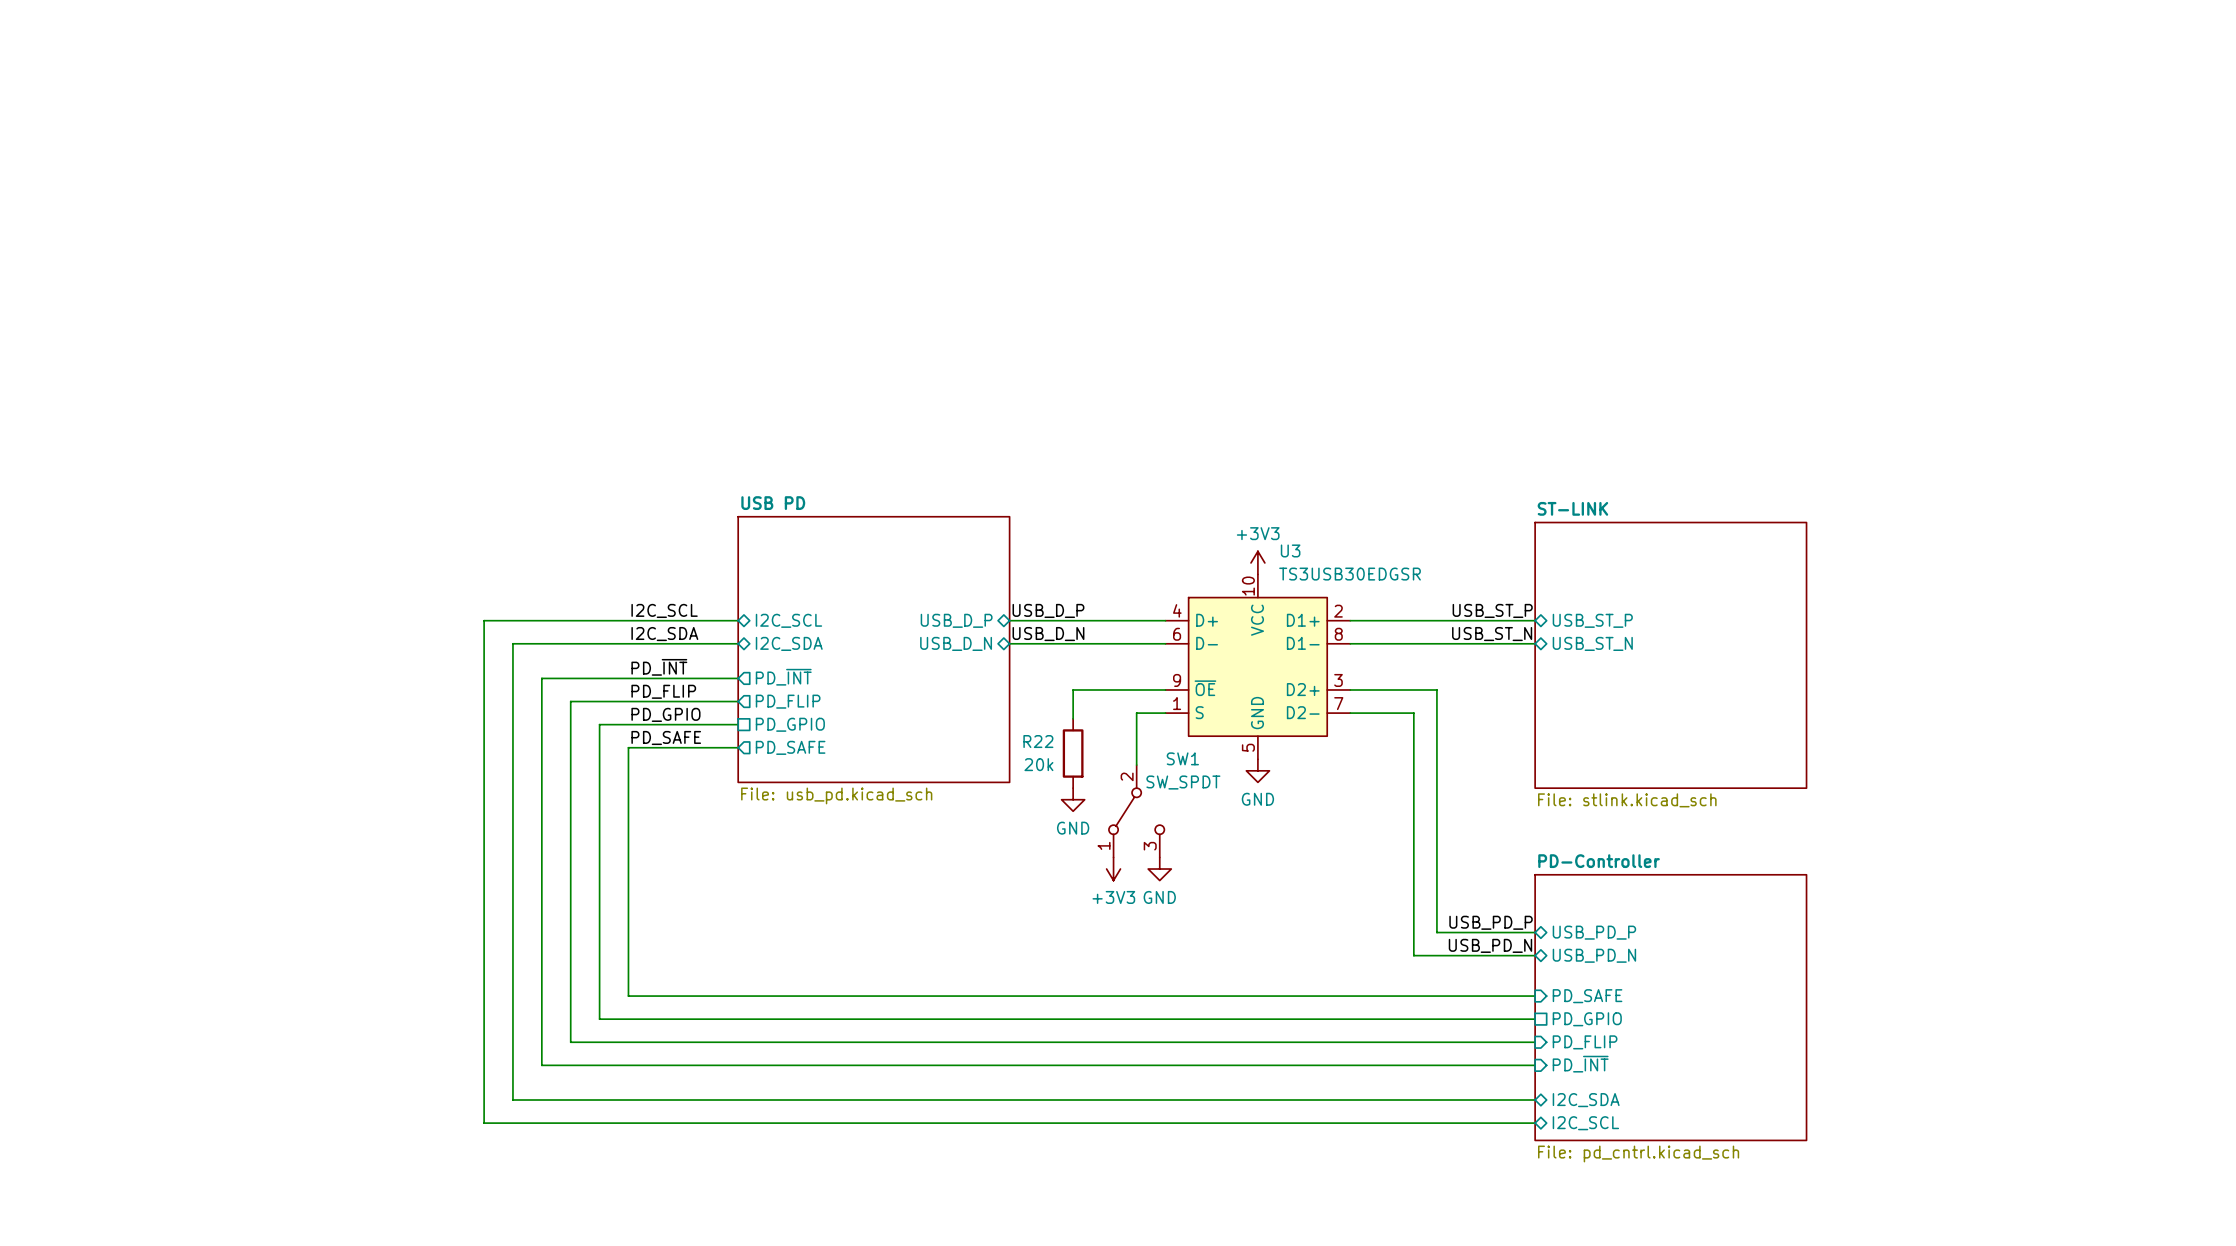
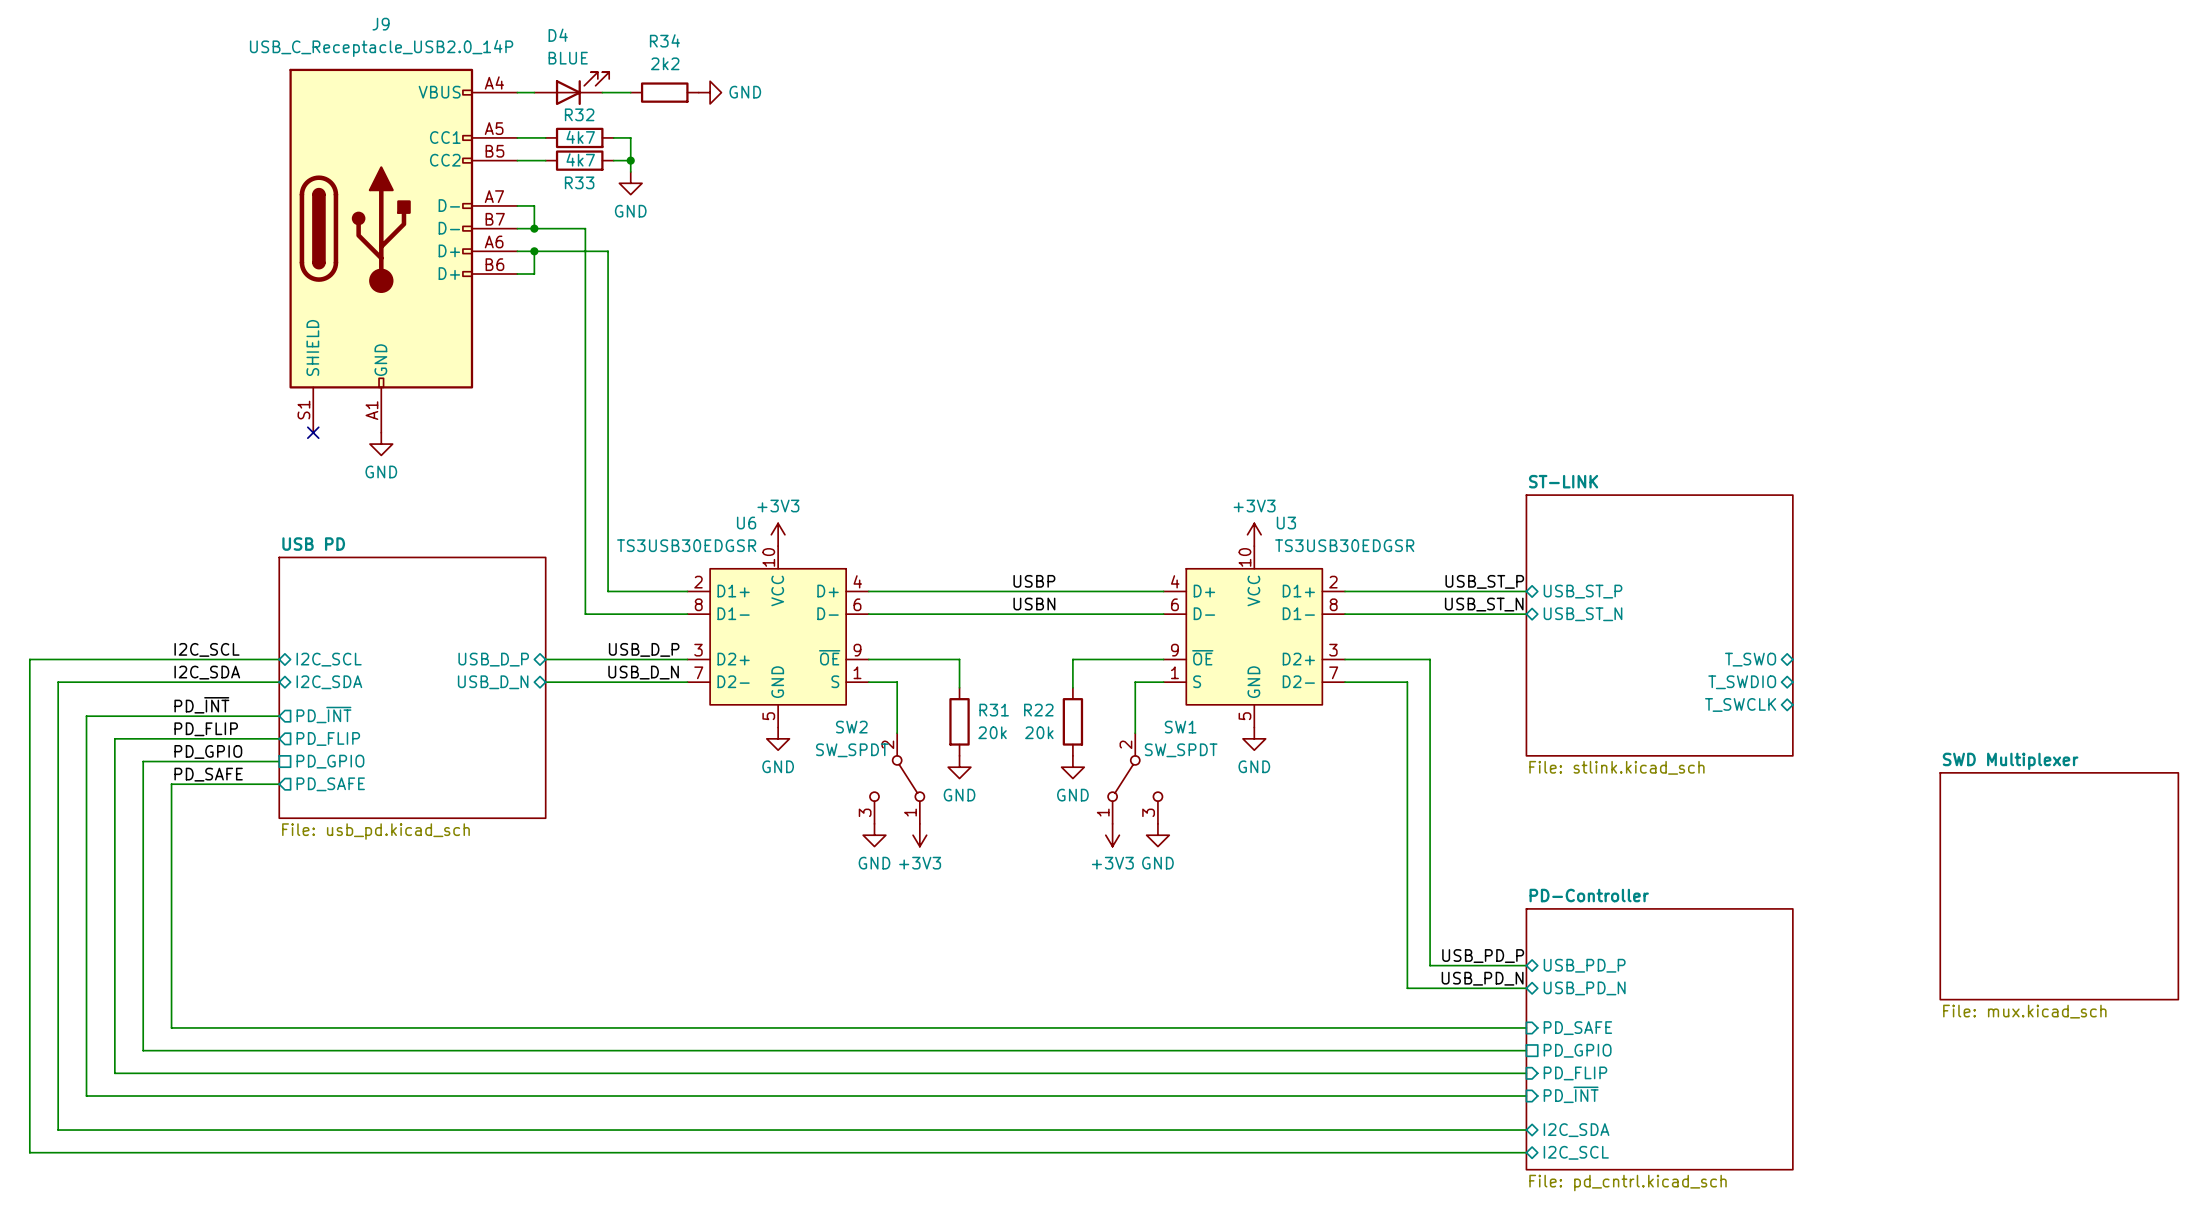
D4: none -> BLUE (571, 88)
wire: none -> (517, 92) (534, 92)
wire: none -> (602, 92) (630, 92)
R34: none -> 2k2 (664, 92)
power symbol: none -> GND (710, 92)
wire: none -> (517, 137) (545, 137)
R32: none -> 4k7 (579, 137)
wire: none -> (613, 137) (630, 137) (630, 171)
wire: none -> (517, 160) (545, 160)
R33: none -> 4k7 (579, 160)
wire: none -> (613, 160) (630, 160)
junction: none -> (630, 160)
power symbol: none -> GND (630, 183)
wire: none -> (517, 205) (534, 205) (534, 228)
junction: none -> (534, 228)
J9: none -> USB_C_Receptacle_USB2.0_14P (403, 250)
wire: none -> (534, 251) (534, 274) (517, 274)
junction: none -> (534, 251)
no-connect mark: none -> (313, 432)
power symbol: none -> GND (381, 444)
power symbol: none -> +3V3 (778, 534)
label: I2C_SCL (664, 610) -> none
label: USB_D_P (1048, 610) -> USBP (1034, 581)
wire: (599, 620) (484, 620) (484, 1123) (1535, 1123) -> (608, 591) (608, 251) (517, 251)
sheet pin: I2C_SCL (788, 620) -> none
wire: none -> (868, 591) (1010, 591)
sheet pin: USB_D_P (956, 620) -> none
label: I2C_SDA (664, 634) -> none
label: USB_D_N (1048, 634) -> USBN (1034, 604)
wire: (576, 643) (512, 643) (512, 1100) (1535, 1100) -> (585, 614) (585, 228) (517, 228)
sheet pin: I2C_SDA (789, 643) -> none
wire: none -> (868, 614) (1010, 614)
sheet pin: USB_D_N (956, 643) -> none
sheet USB PD: File: usb_pd.kicad_sch (873, 649) -> none
U6: none -> TS3USB30EDGSR (778, 636)
label: PD_~{INT} (659, 667) -> none
sheet pin: PD_~{INT} (783, 677) -> none
wire: (738, 678) (541, 678) (541, 1065) -> (279, 784) (171, 784) (171, 1027) (551, 1027)
label: none -> I2C_SCL (206, 649)
label: none -> USB_D_P (644, 649)
wire: none -> (279, 659) (29, 659) (29, 1152) (1526, 1152)
wire: none -> (545, 659) (687, 659)
wire: none -> (868, 659) (959, 659) (959, 687)
sheet pin: none -> I2C_SCL (329, 659)
sheet pin: none -> USB_D_P (493, 659)
sheet pin: none -> T_SWO (1750, 659)
label: PD_FLIP (663, 691) -> none
wire: (738, 701) (570, 701) (570, 1042) (1535, 1042) -> none
sheet pin: PD_FLIP (788, 701) -> none
label: none -> I2C_SDA (207, 672)
label: none -> USB_D_N (643, 672)
wire: none -> (279, 682) (58, 682) (58, 1130) (1526, 1130)
sheet pin: none -> I2C_SDA (329, 682)
sheet pin: none -> USB_D_N (493, 682)
wire: none -> (545, 682) (687, 682)
wire: none -> (868, 682) (897, 682) (897, 733)
sheet pin: none -> T_SWDIO (1742, 682)
label: PD_GPIO (665, 714) -> none
sheet USB PD: none -> File: usb_pd.kicad_sch (412, 687)
wire: (738, 724) (599, 724) (599, 1019) (1535, 1019) -> none
sheet pin: PD_GPIO (790, 724) -> none
label: none -> PD_~{INT} (201, 705)
sheet pin: none -> T_SWCLK (1740, 704)
label: PD_SAFE (666, 737) -> none
sheet pin: none -> PD_~{INT} (323, 714)
wire: none -> (279, 716) (86, 716) (86, 1096) (1526, 1096)
wire: (738, 747) (628, 747) (628, 996) (1535, 996) -> none
sheet pin: PD_SAFE (790, 747) -> none
R31: none -> 20k (959, 721)
label: none -> PD_FLIP (206, 729)
wire: none -> (279, 738) (114, 738) (114, 1073) (1526, 1073)
sheet pin: none -> PD_FLIP (328, 738)
power symbol: none -> GND (778, 738)
label: none -> PD_GPIO (208, 751)
wire: none -> (279, 761) (143, 761) (143, 1050) (1526, 1050)
sheet pin: none -> PD_GPIO (330, 761)
power symbol: none -> GND (959, 767)
label: none -> PD_SAFE (208, 774)
SW2: none -> SW_SPDT (897, 778)
sheet pin: none -> PD_SAFE (330, 784)
power symbol: none -> GND (874, 835)
power symbol: none -> +3V3 (919, 835)
sheet SWD Multiplexer: none -> File: mux.kicad_sch (2059, 886)
label position: USB_PD_P (1491, 922) -> USB_PD_P (1483, 956)
wire: (1436, 932) (1535, 932) -> (1430, 897) (1430, 965) (1526, 965)
sheet pin position: USB_PD_P (1594, 932) -> USB_PD_P (1584, 965)
label position: USB_PD_N (1490, 945) -> USB_PD_N (1482, 978)
wire: (1413, 955) (1535, 955) -> (1407, 920) (1407, 988) (1526, 988)
sheet pin position: USB_PD_N (1594, 955) -> USB_PD_N (1584, 988)
sheet pin: PD_SAFE (1587, 996) -> none
sheet PD-Controller position: (1670, 1007) -> (1659, 1039)
sheet pin position: PD_GPIO (1587, 1019) -> PD_GPIO (1577, 1050)
sheet pin position: PD_FLIP (1585, 1042) -> PD_FLIP (1575, 1073)
sheet pin: PD_~{INT} (1580, 1064) -> PD_SAFE (1577, 1028)
sheet pin position: I2C_SDA (1586, 1100) -> I2C_SDA (1576, 1130)
sheet pin position: I2C_SCL (1585, 1123) -> I2C_SCL (1576, 1152)
sheet pin: none -> PD_~{INT} (1571, 1094)

